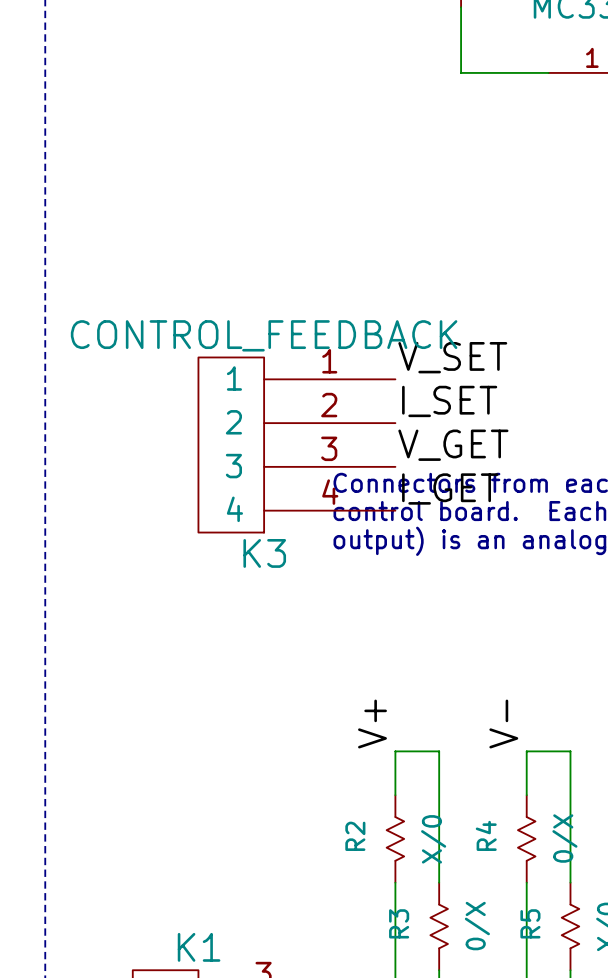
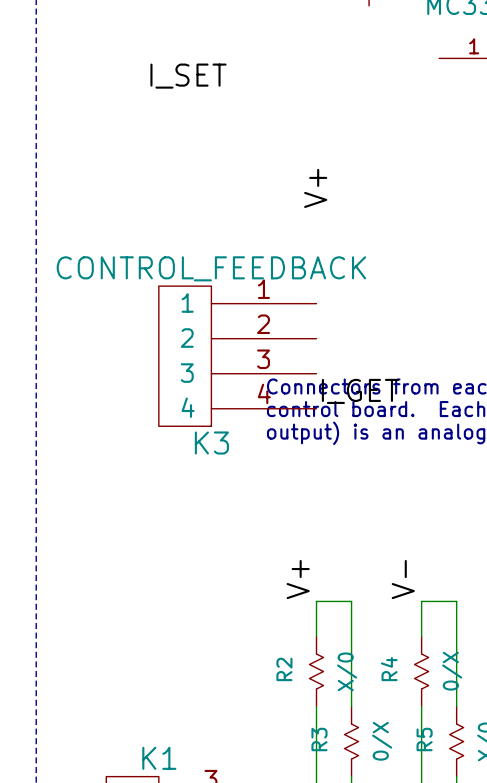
wire: (461, 7) (461, 72) (548, 72) -> none
label: none -> I_SET (188, 76)
label: none -> V+ (315, 188)
label: V_SET (452, 357) -> none
label: I_SET (449, 401) -> none
label: V_GET (453, 445) -> none

